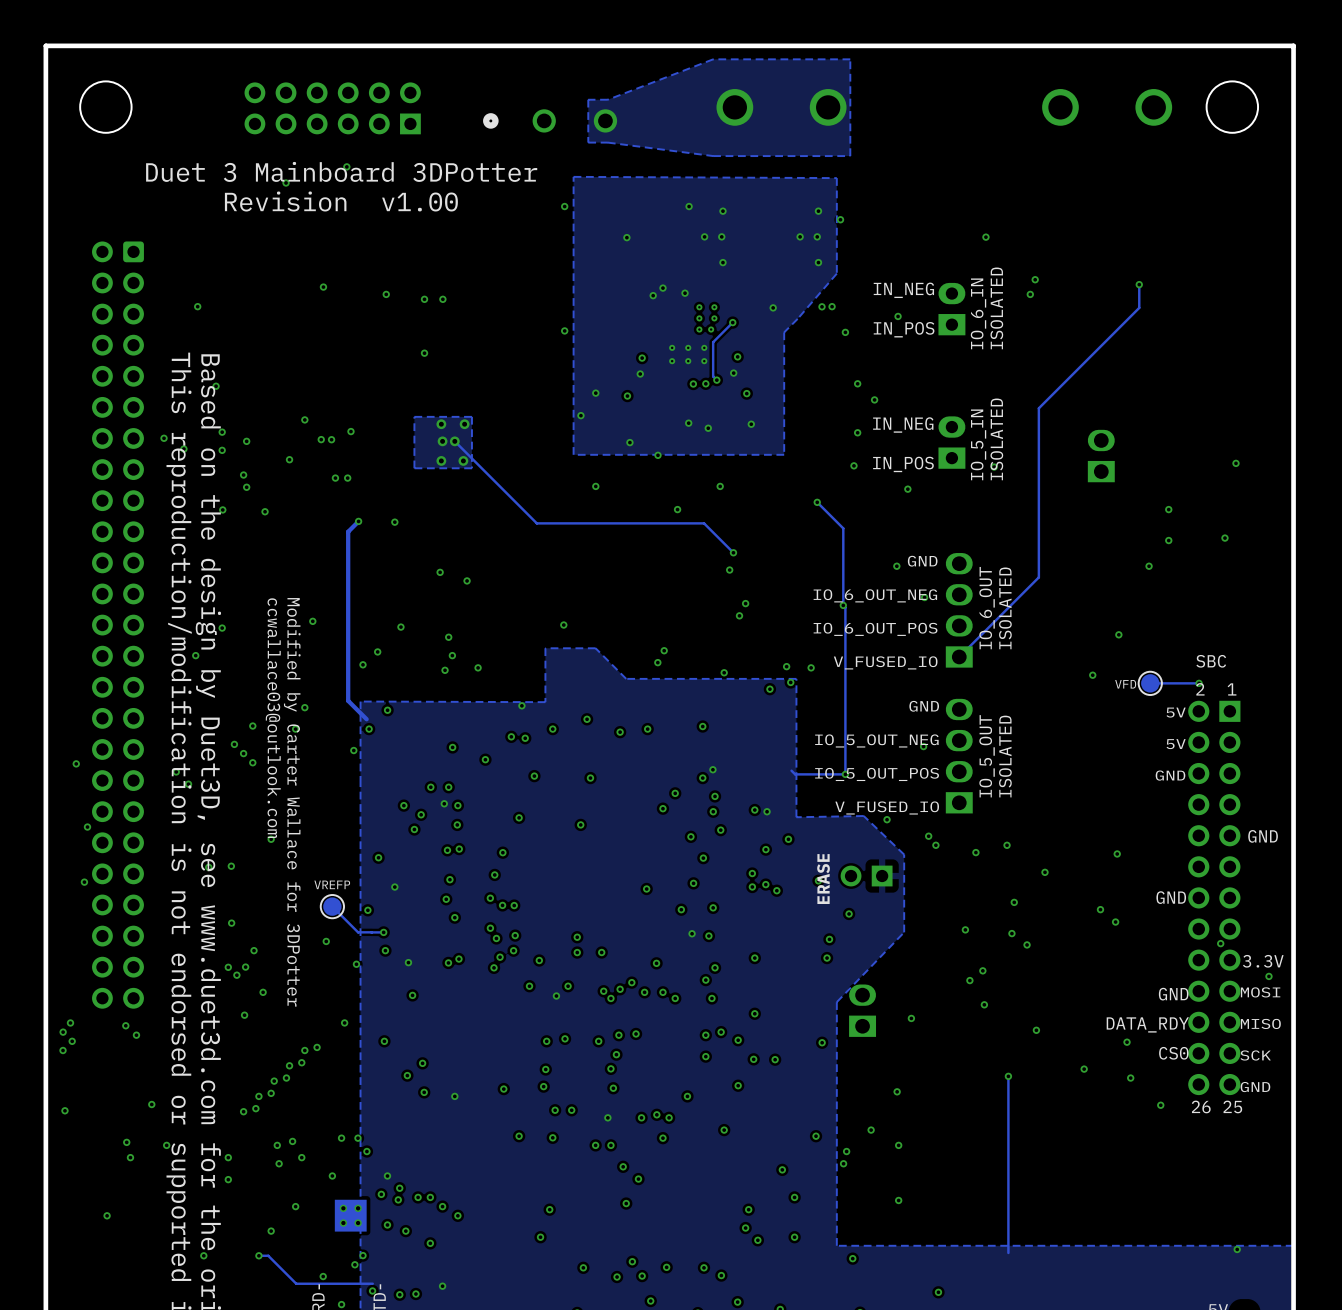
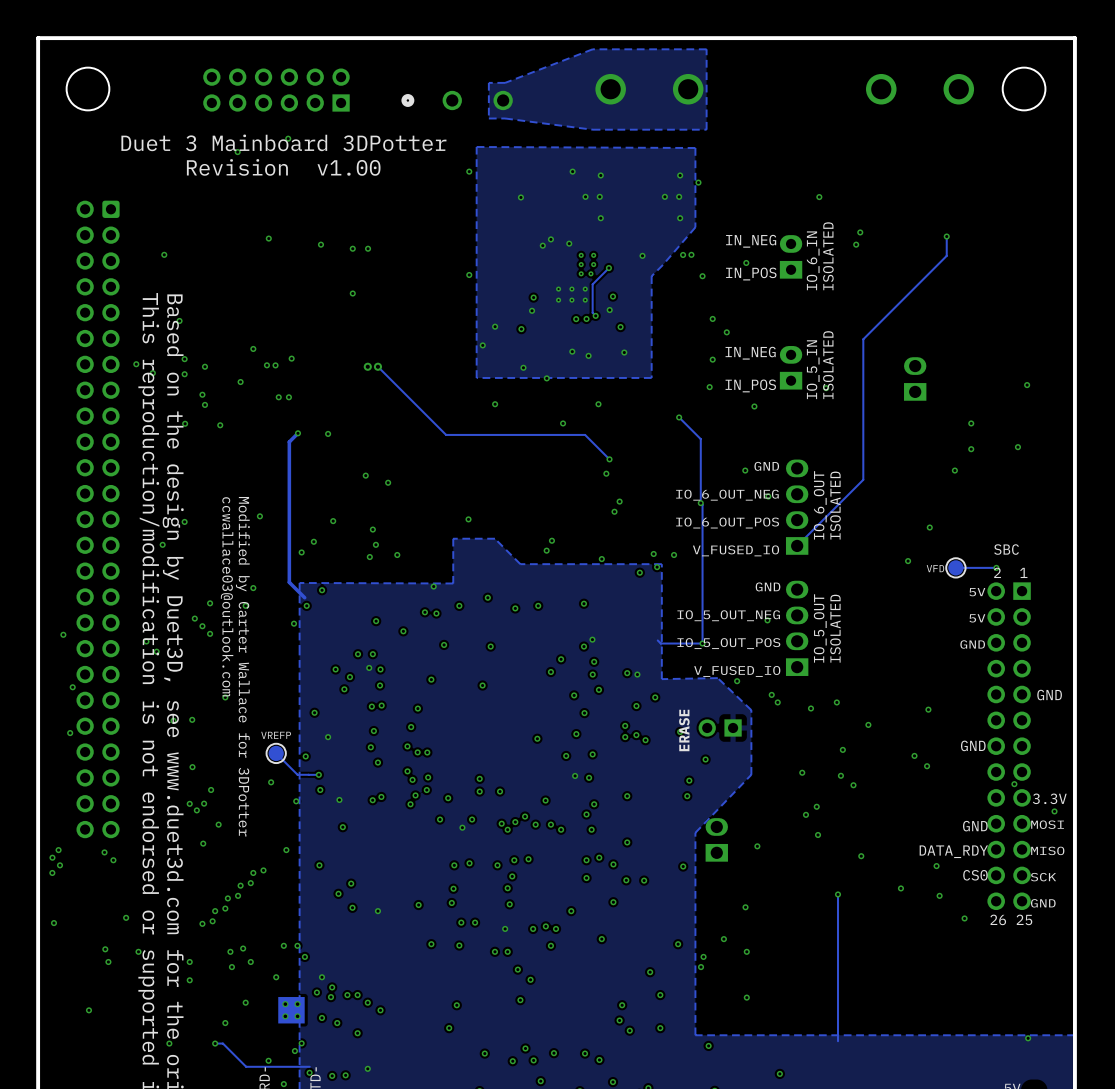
zone outline: (471, 416) (414, 416) (414, 468) (471, 468) (471, 416) -> none
via: (441, 424) -> none
via: (464, 424) -> none
via: (441, 460) -> none
via: (463, 460) -> none

